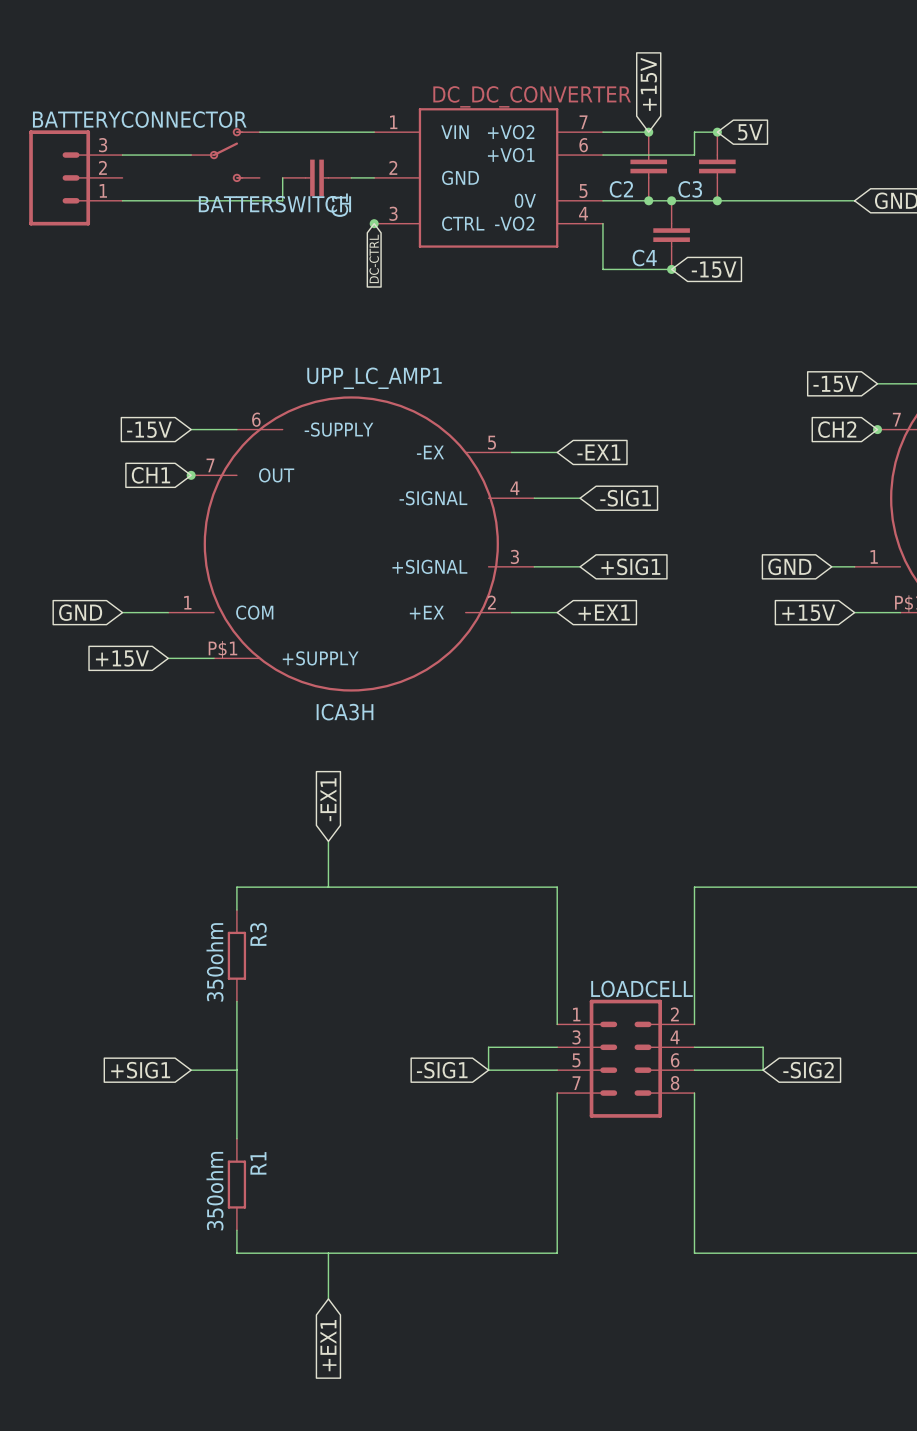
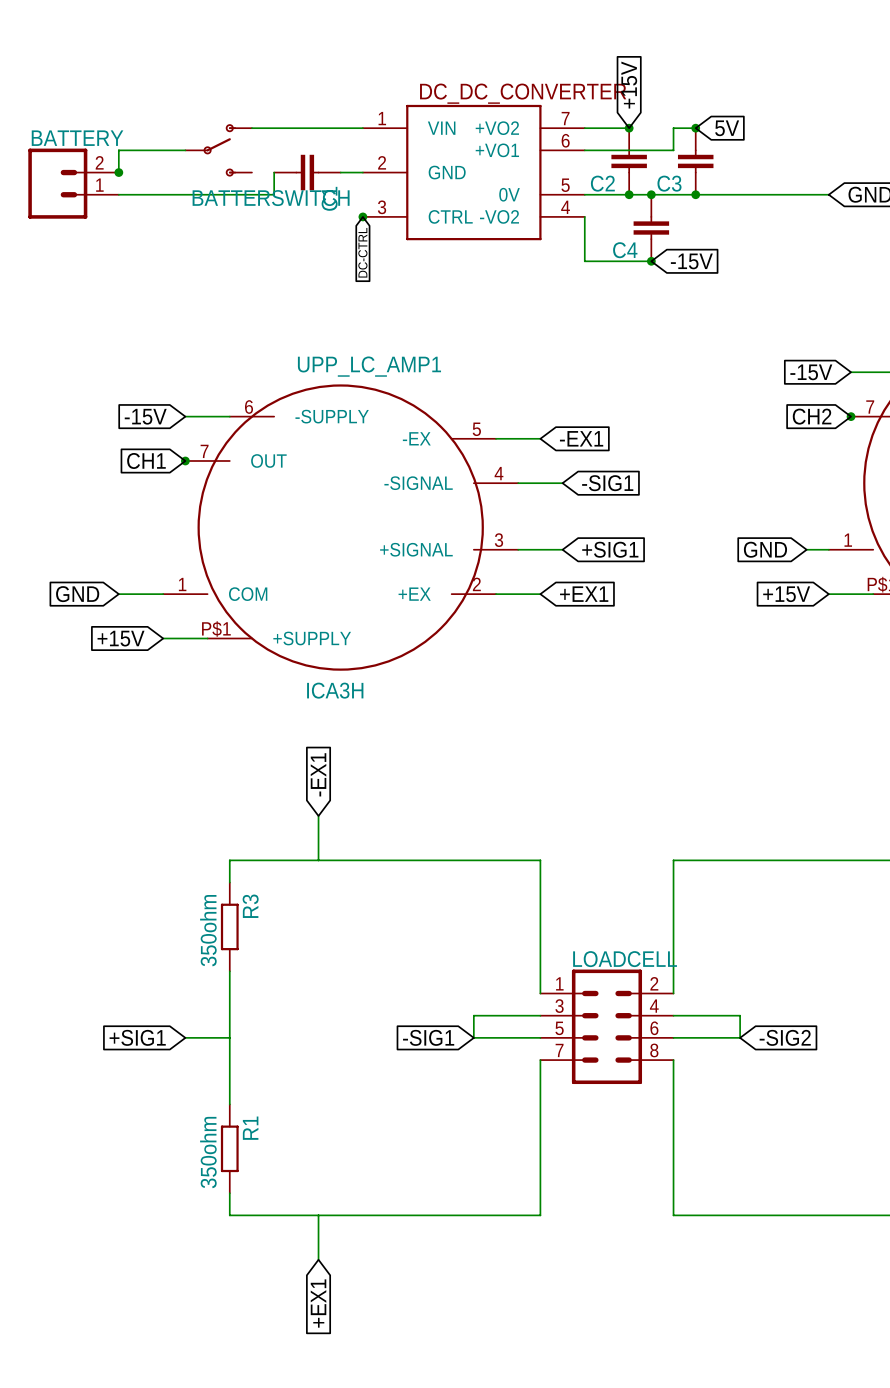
wire: none -> (118, 150) (118, 172)
BATTERYCONNECTOR: (75, 177) -> none
junction: none -> (118, 172)
BATTERY: none -> (73, 183)

